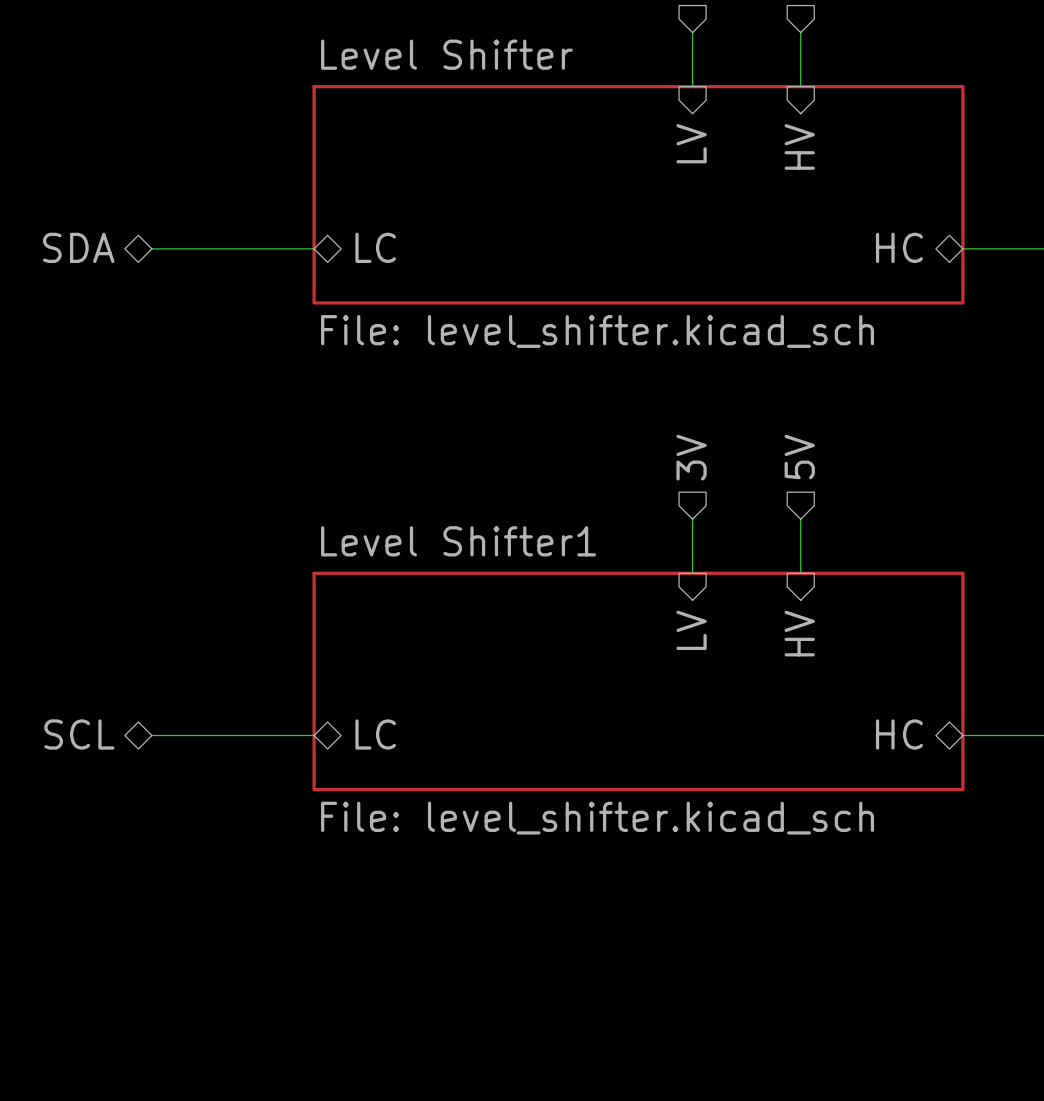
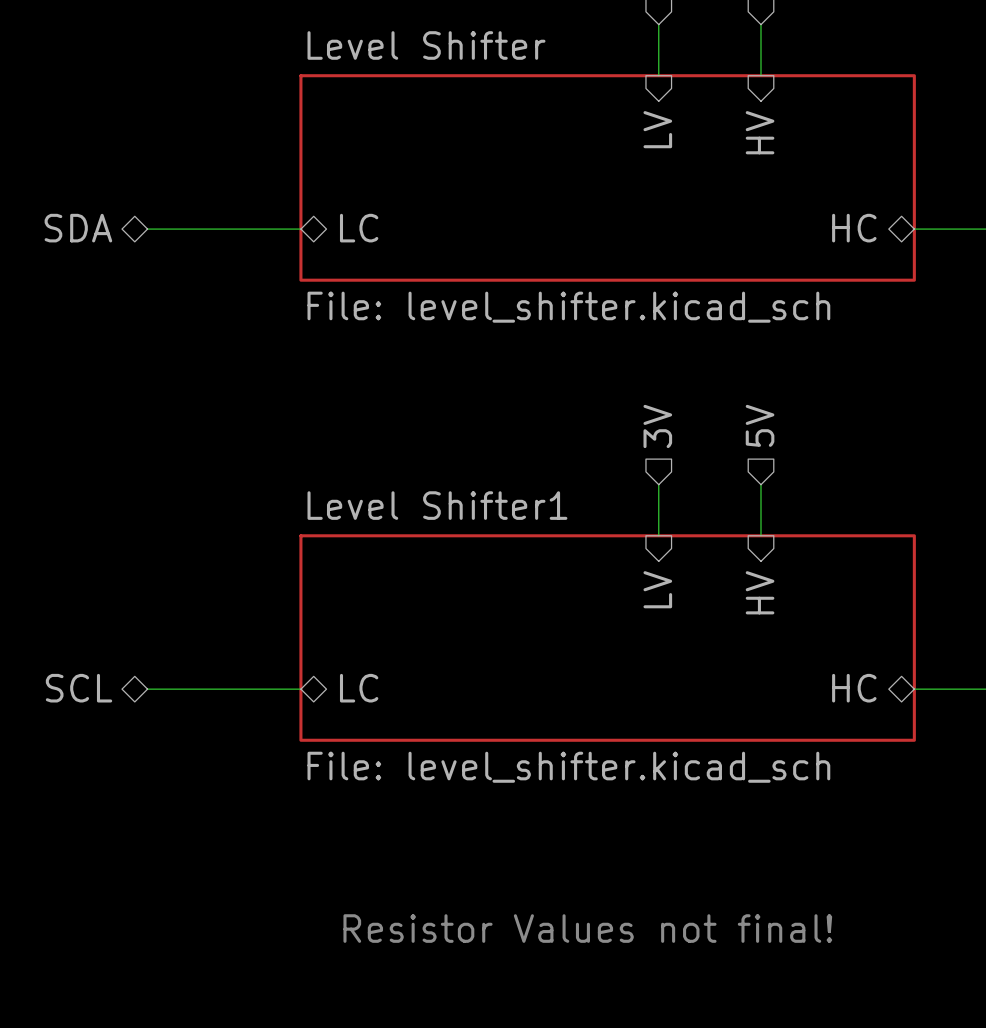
text: none -> Resistor Values not final! (587, 928)

